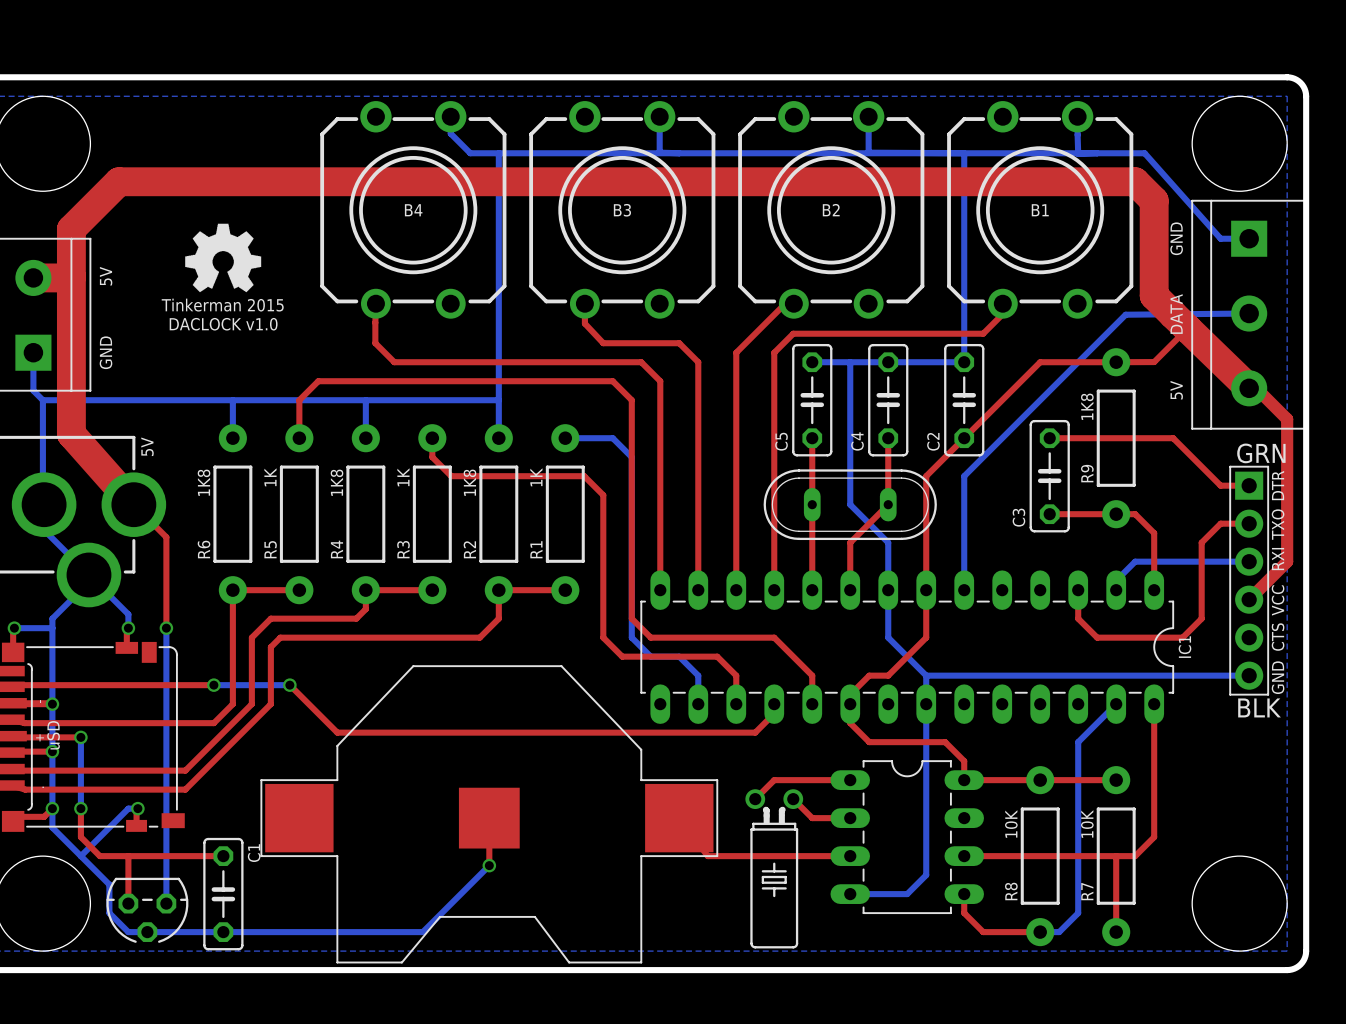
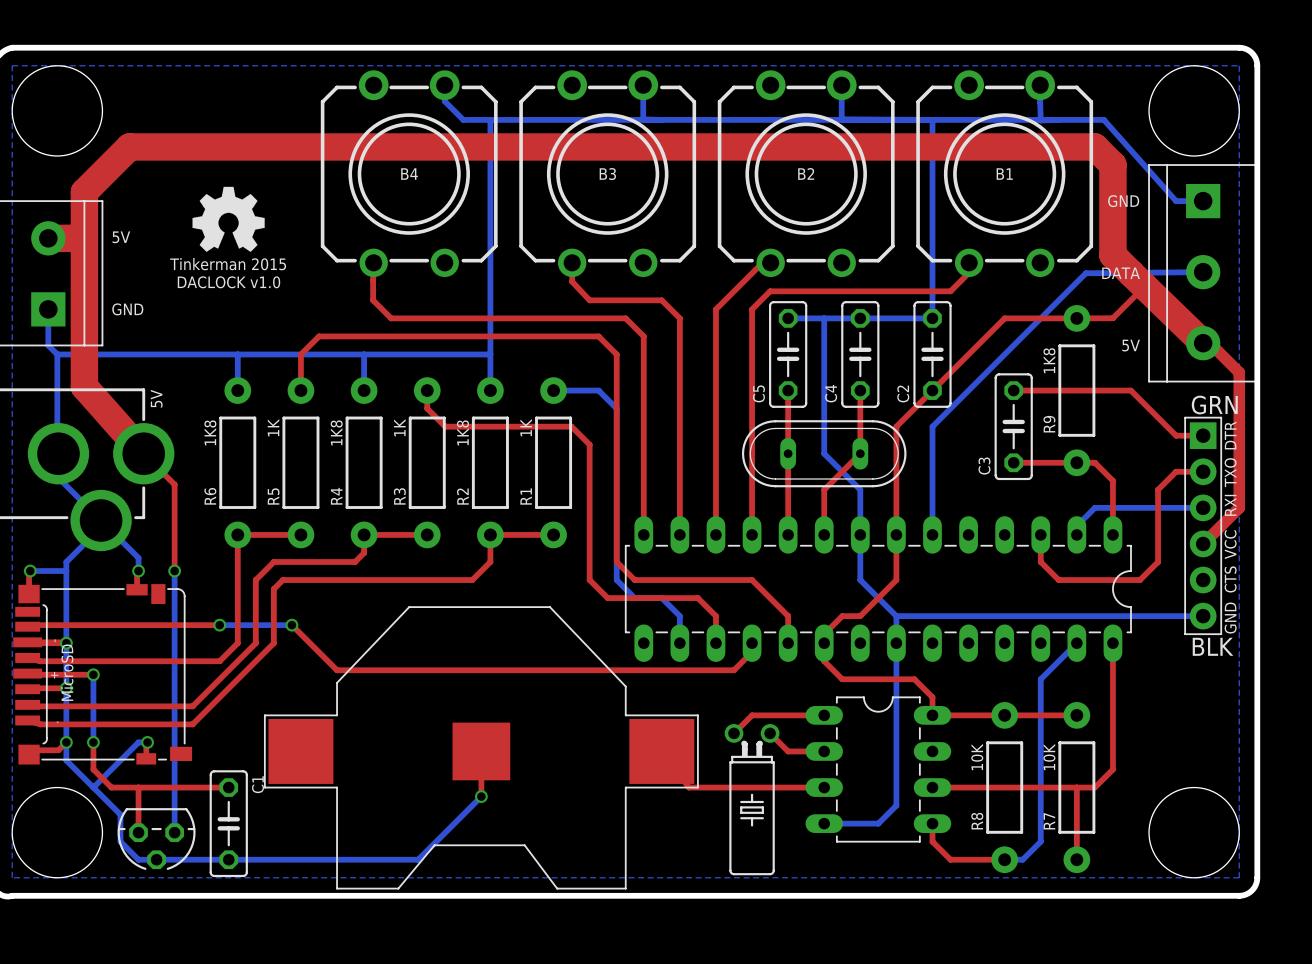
text rotation: 0° (1176, 238) -> 90° clockwise (1123, 201)
text rotation: 0° (106, 276) -> 90° clockwise (121, 237)
text rotation: 0° (1176, 314) -> 90° clockwise (1121, 273)
text rotation: 0° (105, 352) -> 90° clockwise (127, 309)
text rotation: 0° (1176, 390) -> 90° clockwise (1131, 345)
IC1 name: IC1 (1184, 647) -> none
part value: uSD (53, 735) -> MicroSD (67, 672)

